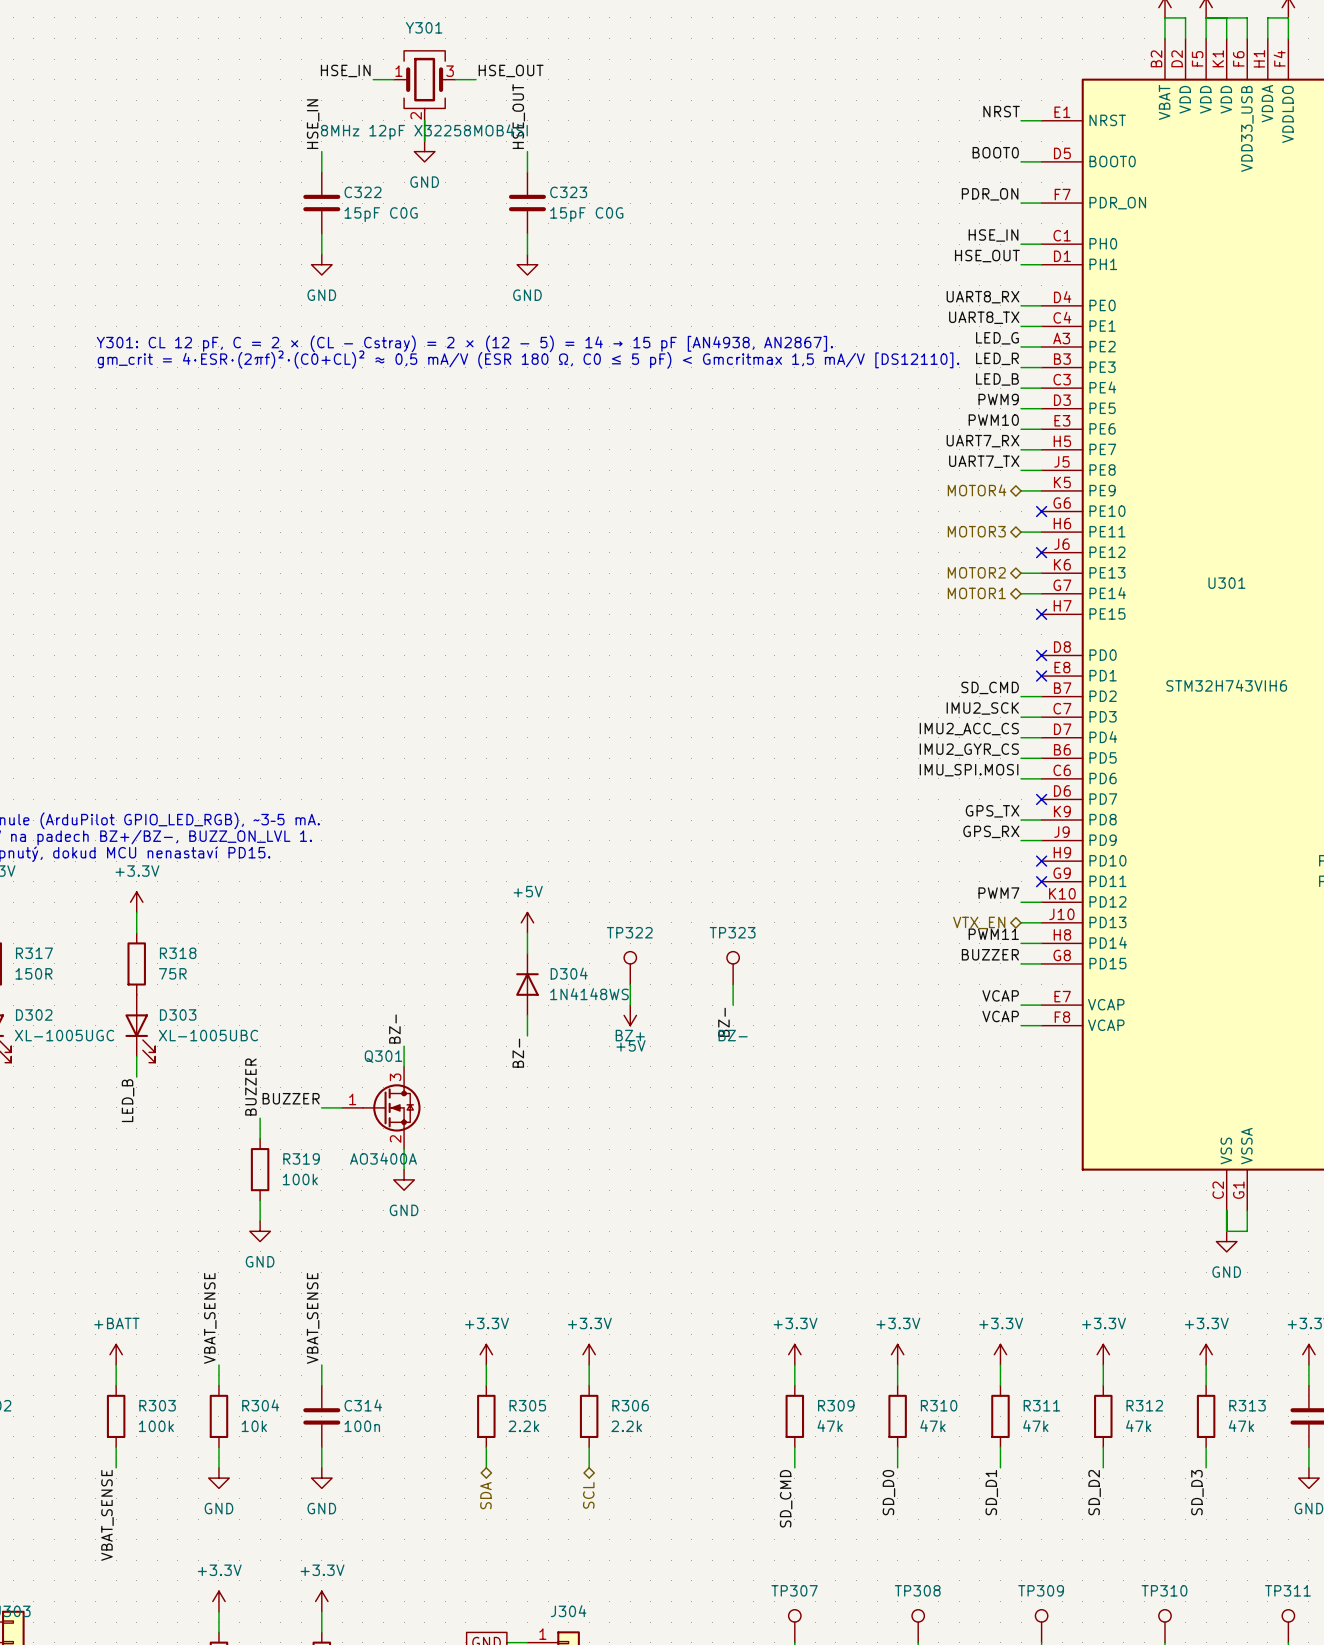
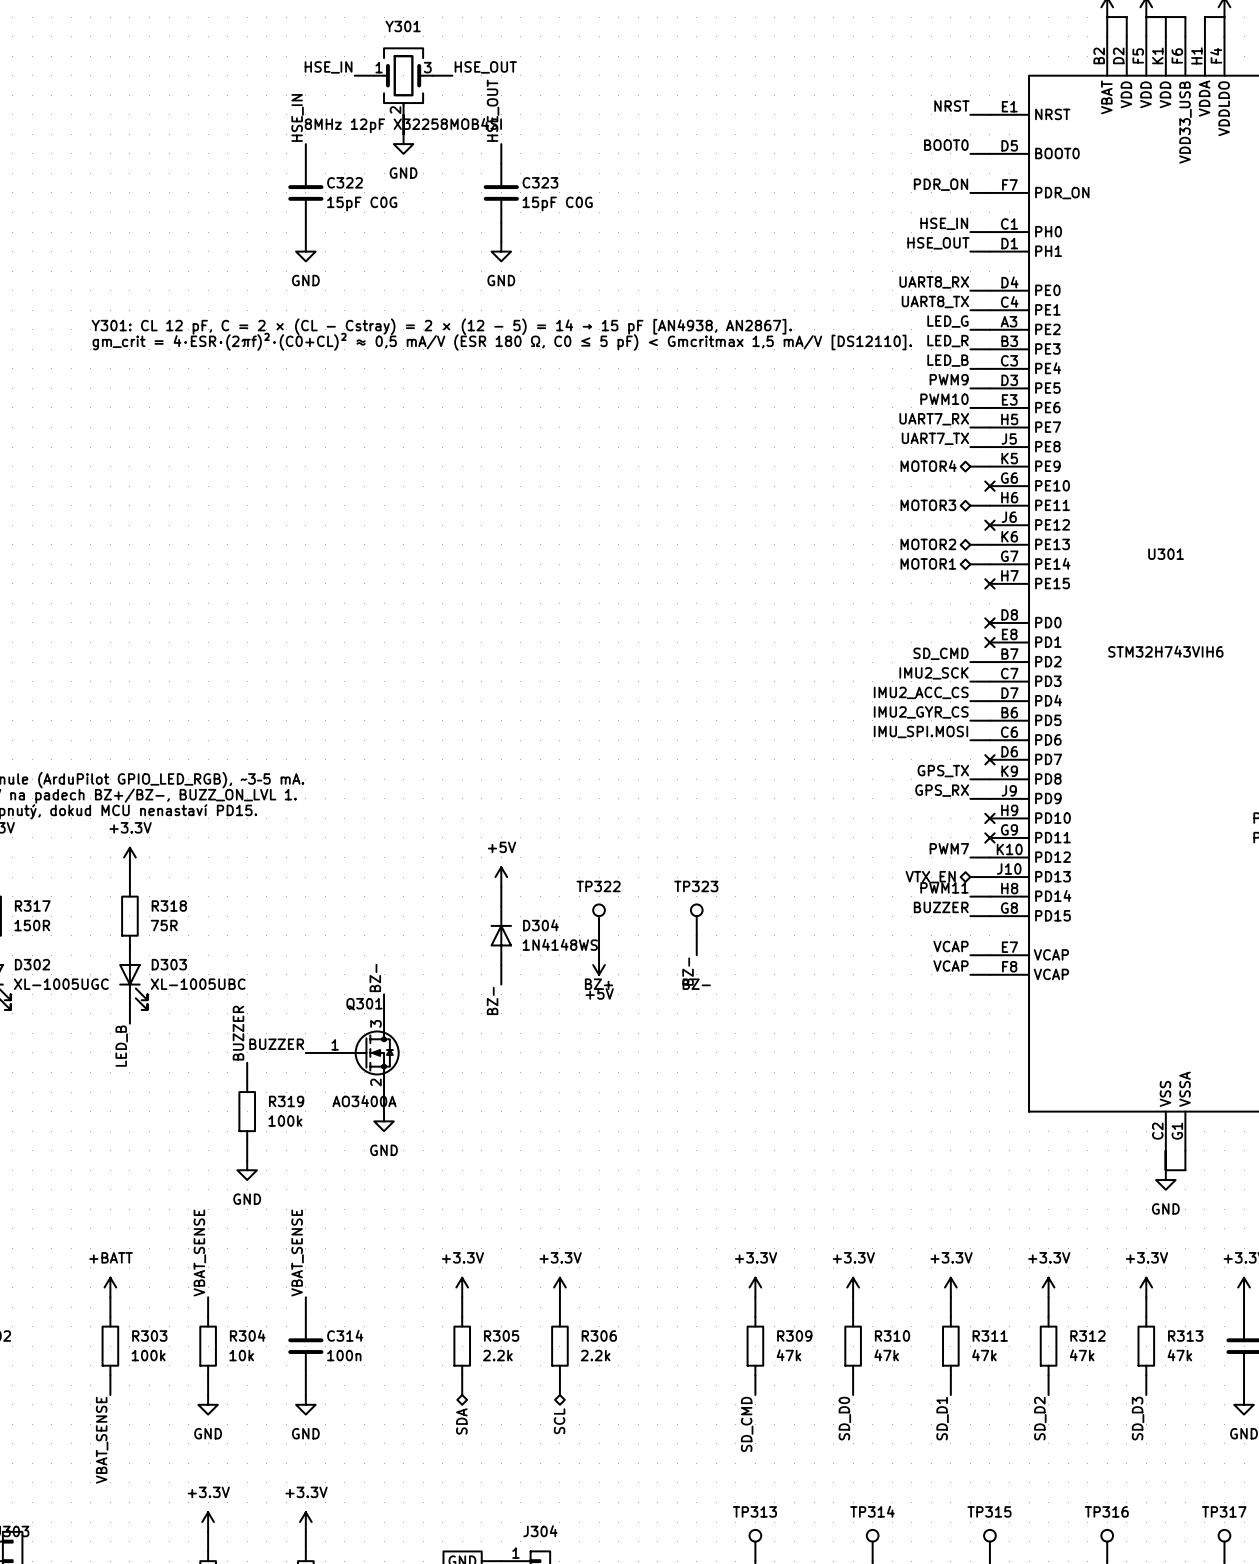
TP307 name: TP307 (794, 1590) -> TP313 (754, 1511)
TP308 name: TP308 (917, 1590) -> TP314 (872, 1511)
TP309 name: TP309 (1041, 1590) -> TP315 (989, 1511)
TP310 name: TP310 (1164, 1590) -> TP316 (1106, 1511)
TP311 name: TP311 (1287, 1590) -> TP317 (1224, 1511)

